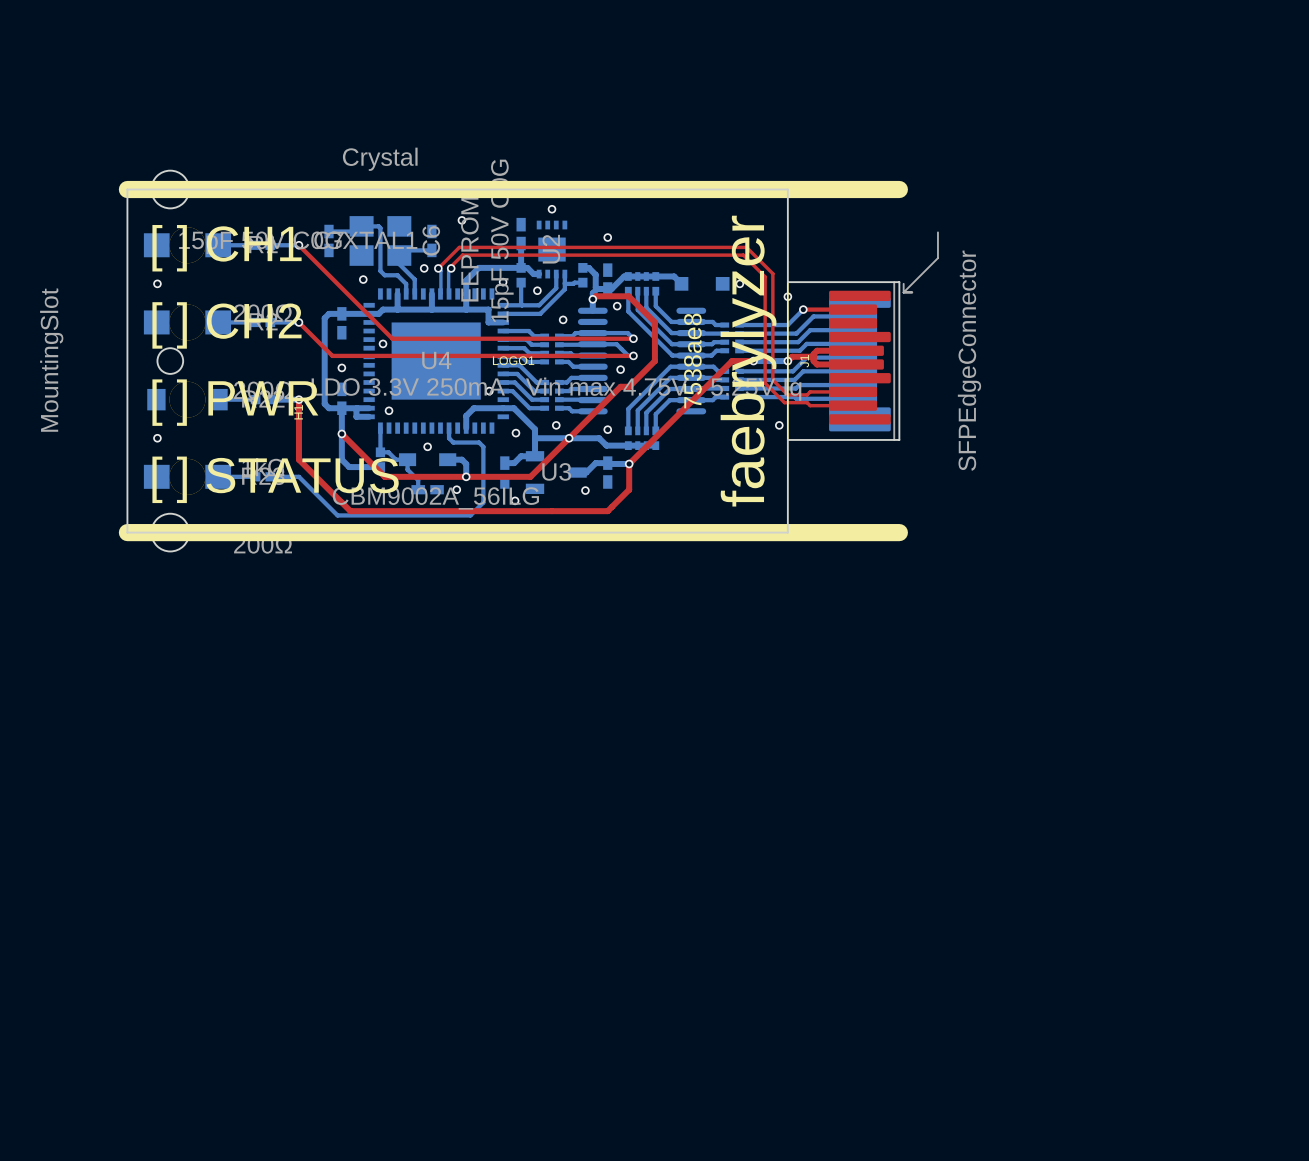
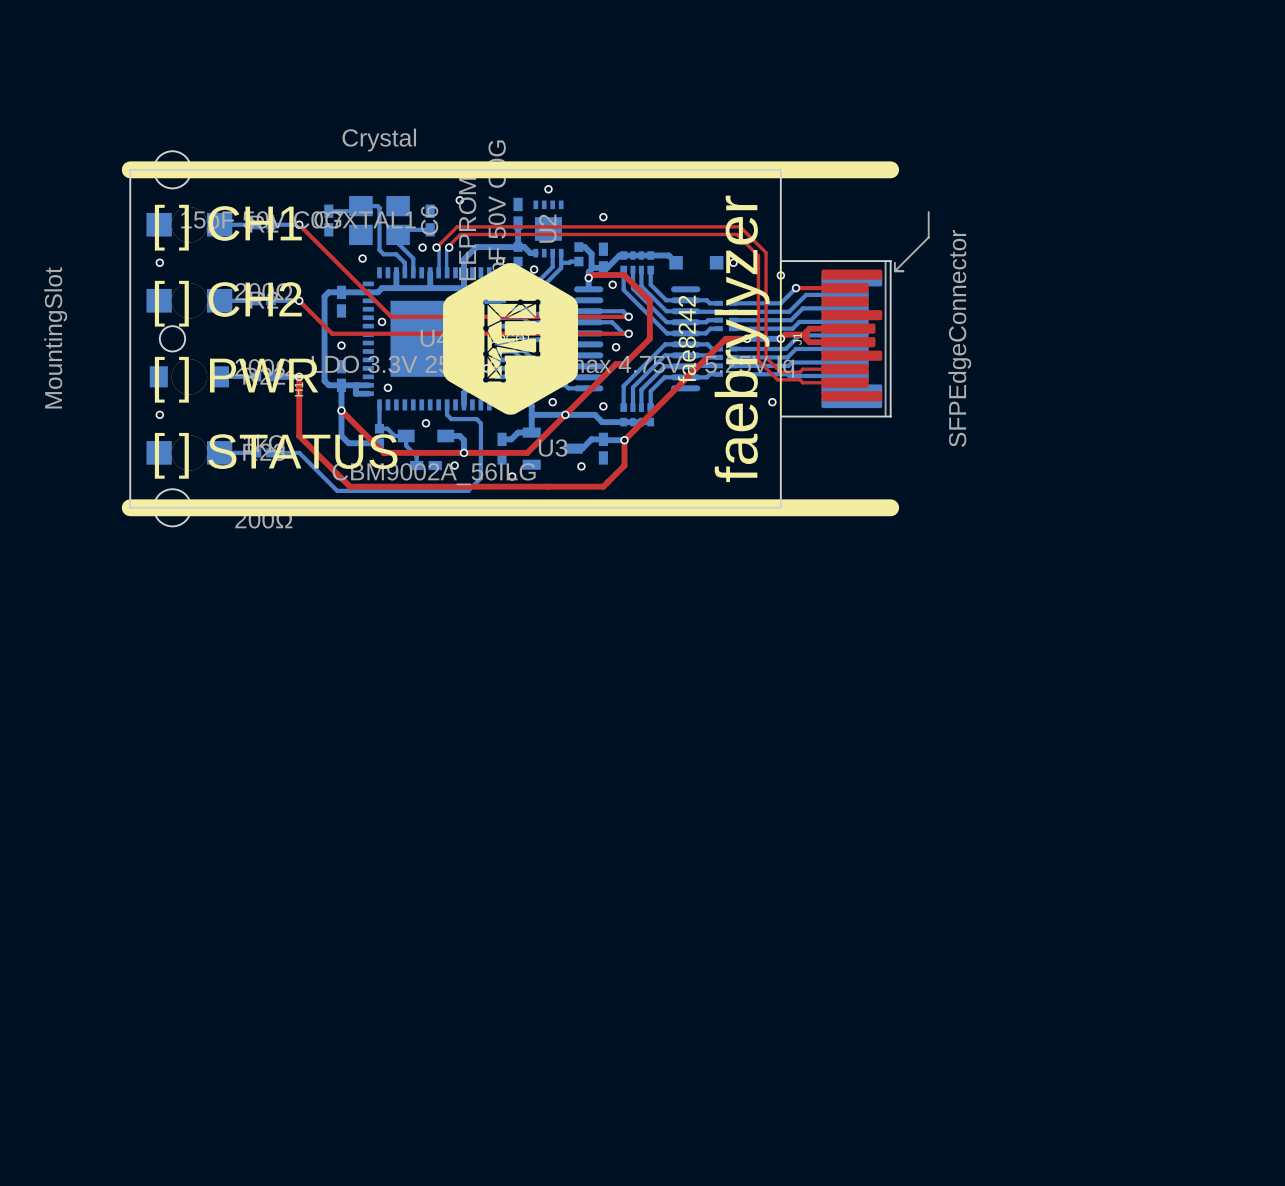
LOGO1 footprint: [492, 356, 535, 366] -> [443, 263, 578, 415]
text: 7538ae8 (692, 360) -> fae8242 (686, 339)

